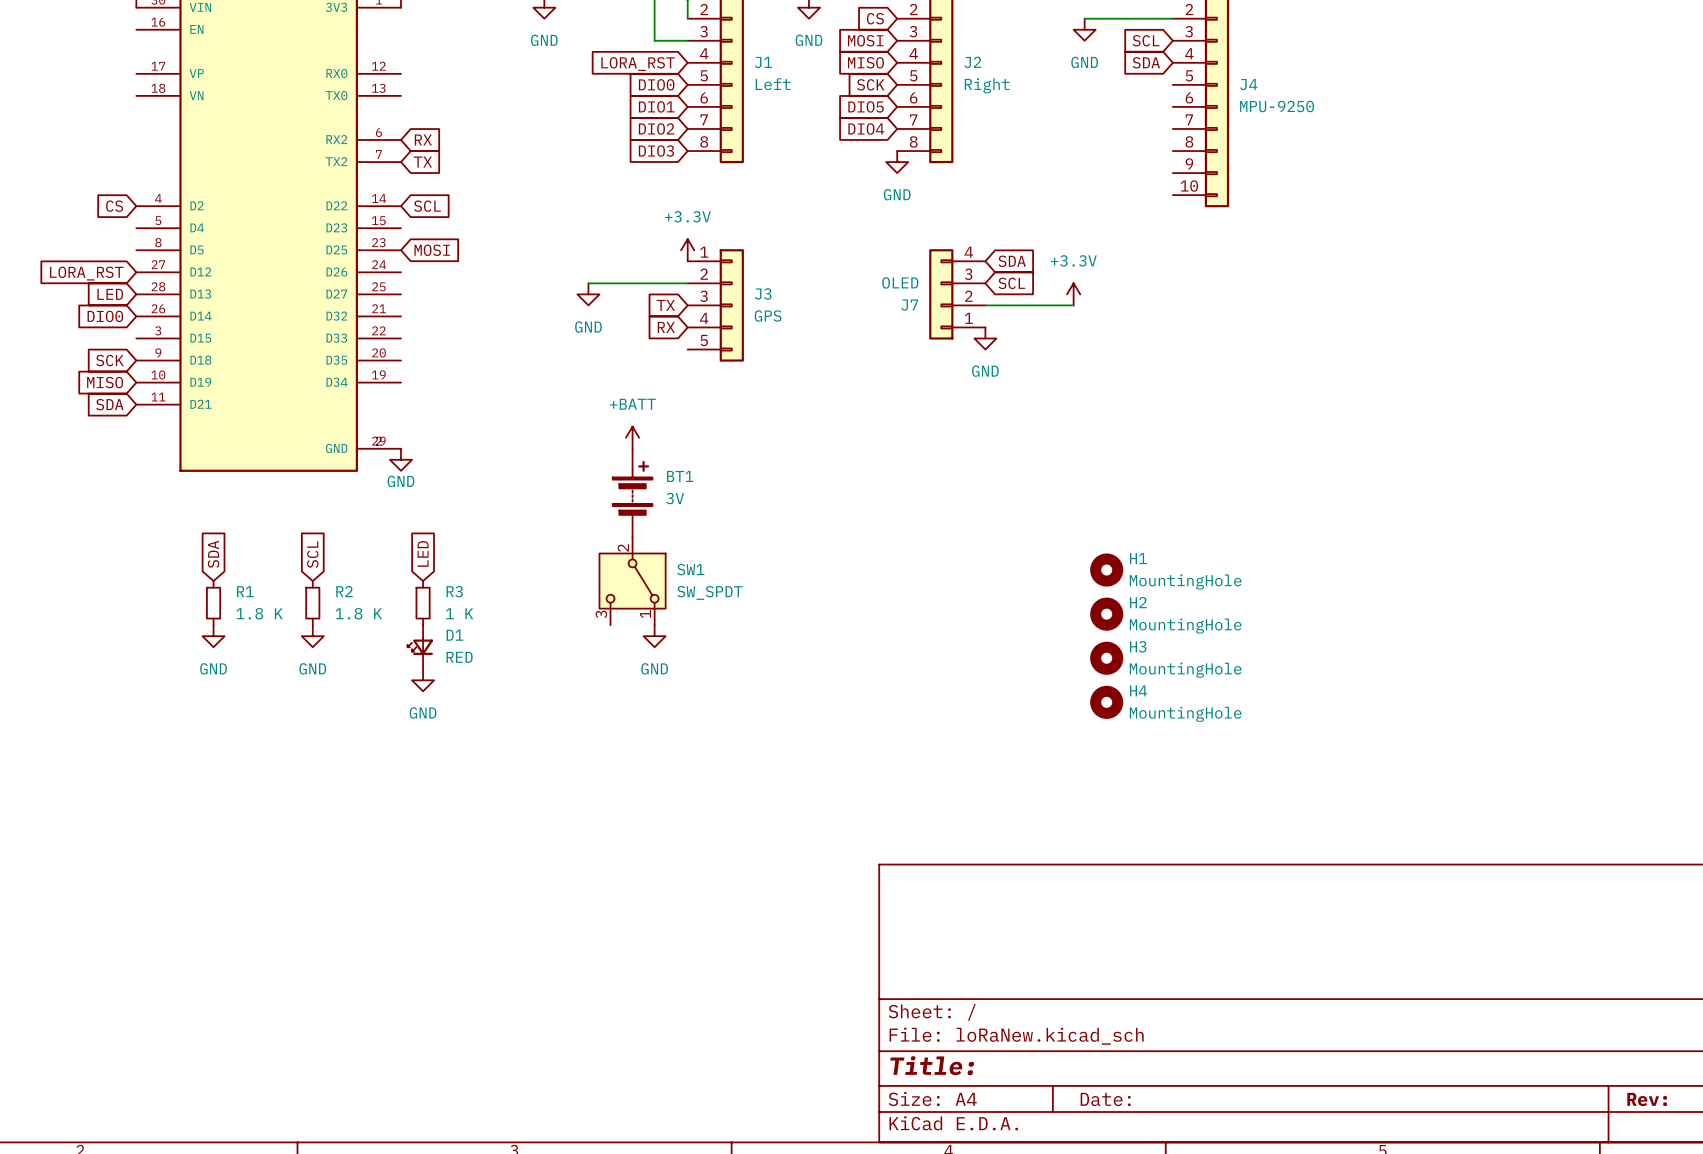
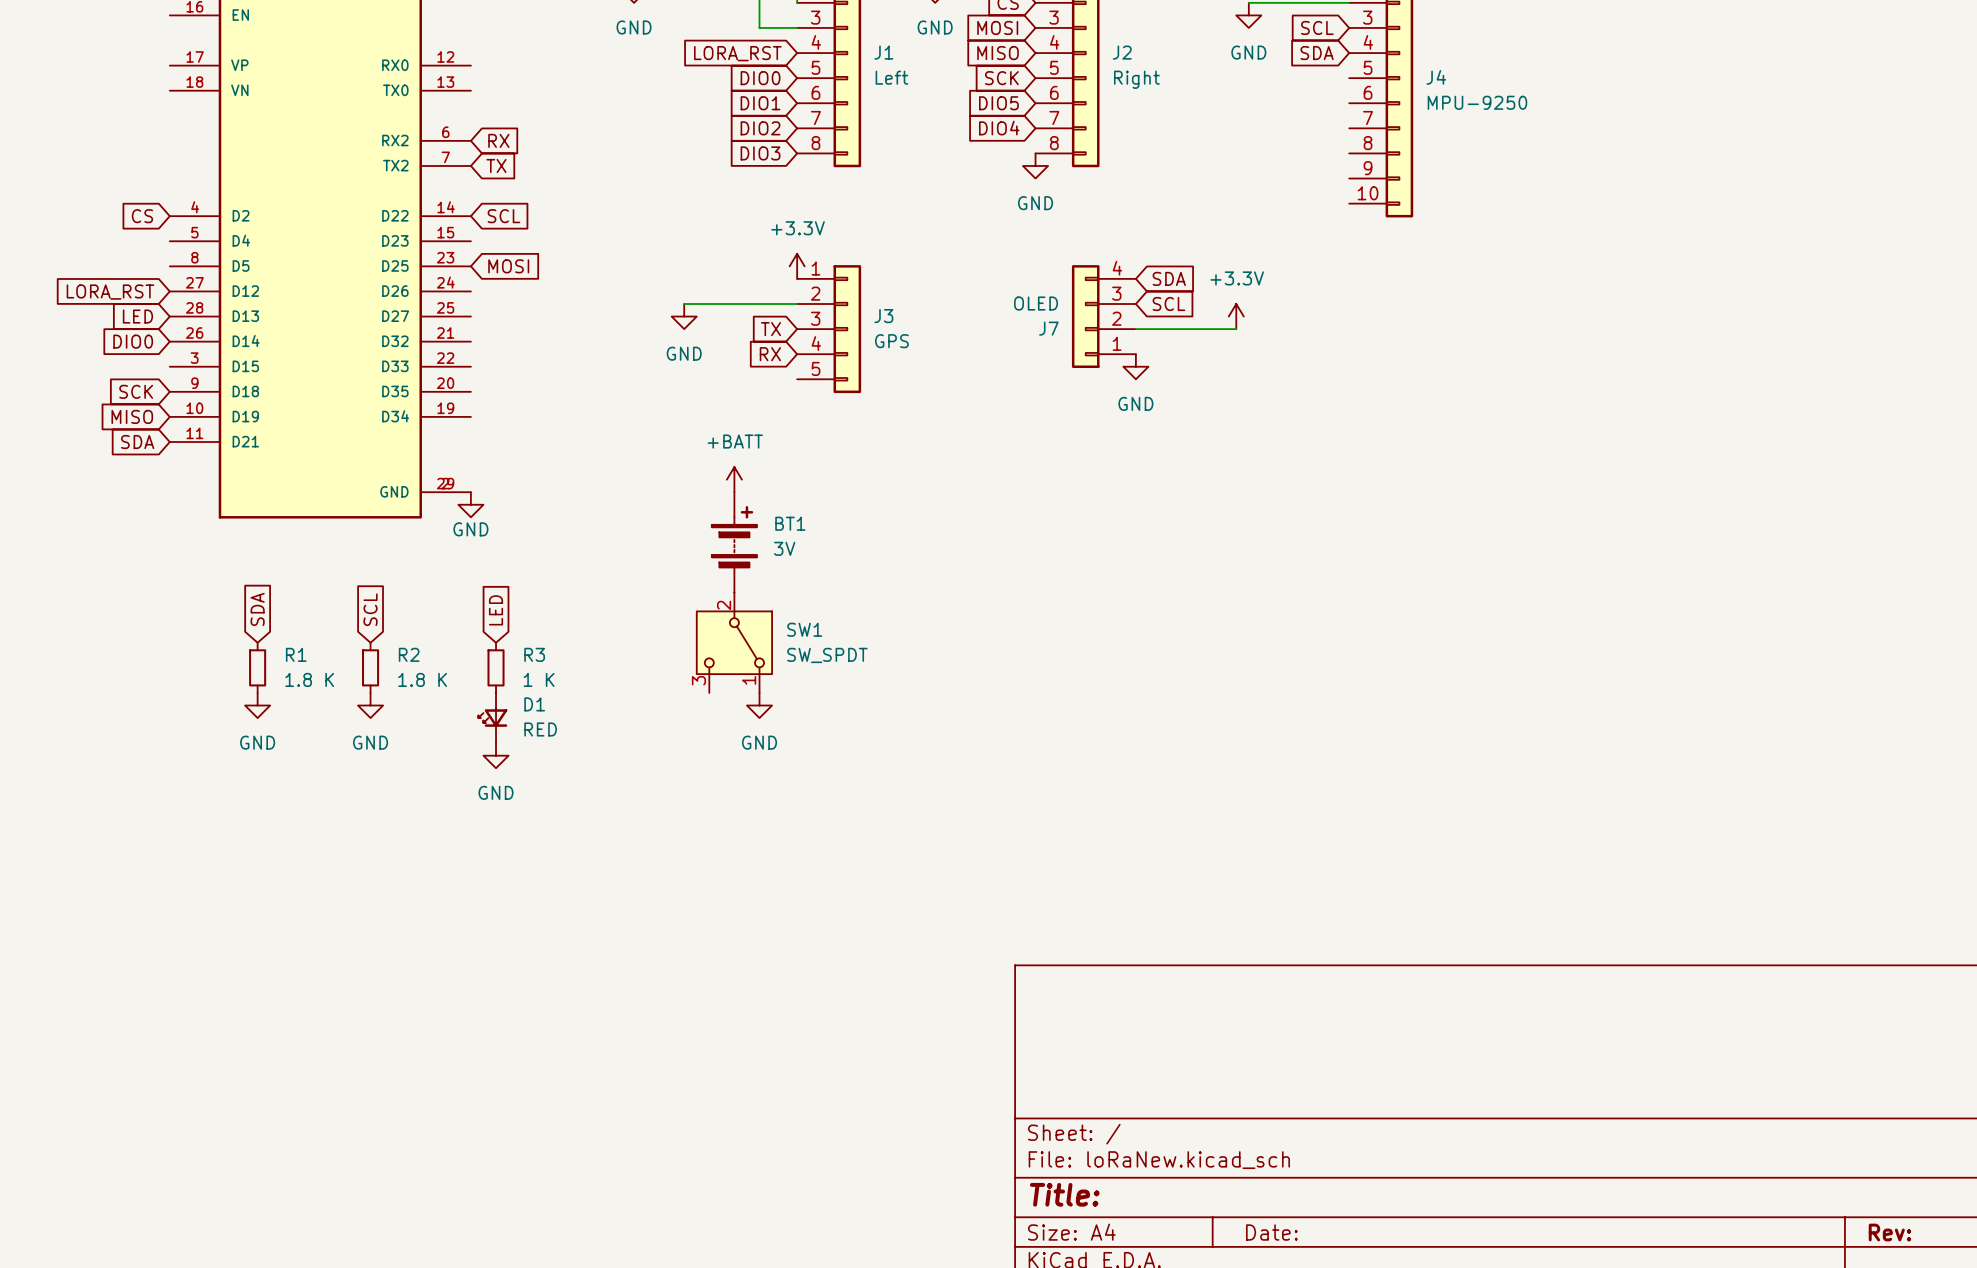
H1: MountingHole (1106, 570) -> none
H2: MountingHole (1106, 614) -> none
H3: MountingHole (1106, 658) -> none
H4: MountingHole (1106, 702) -> none

